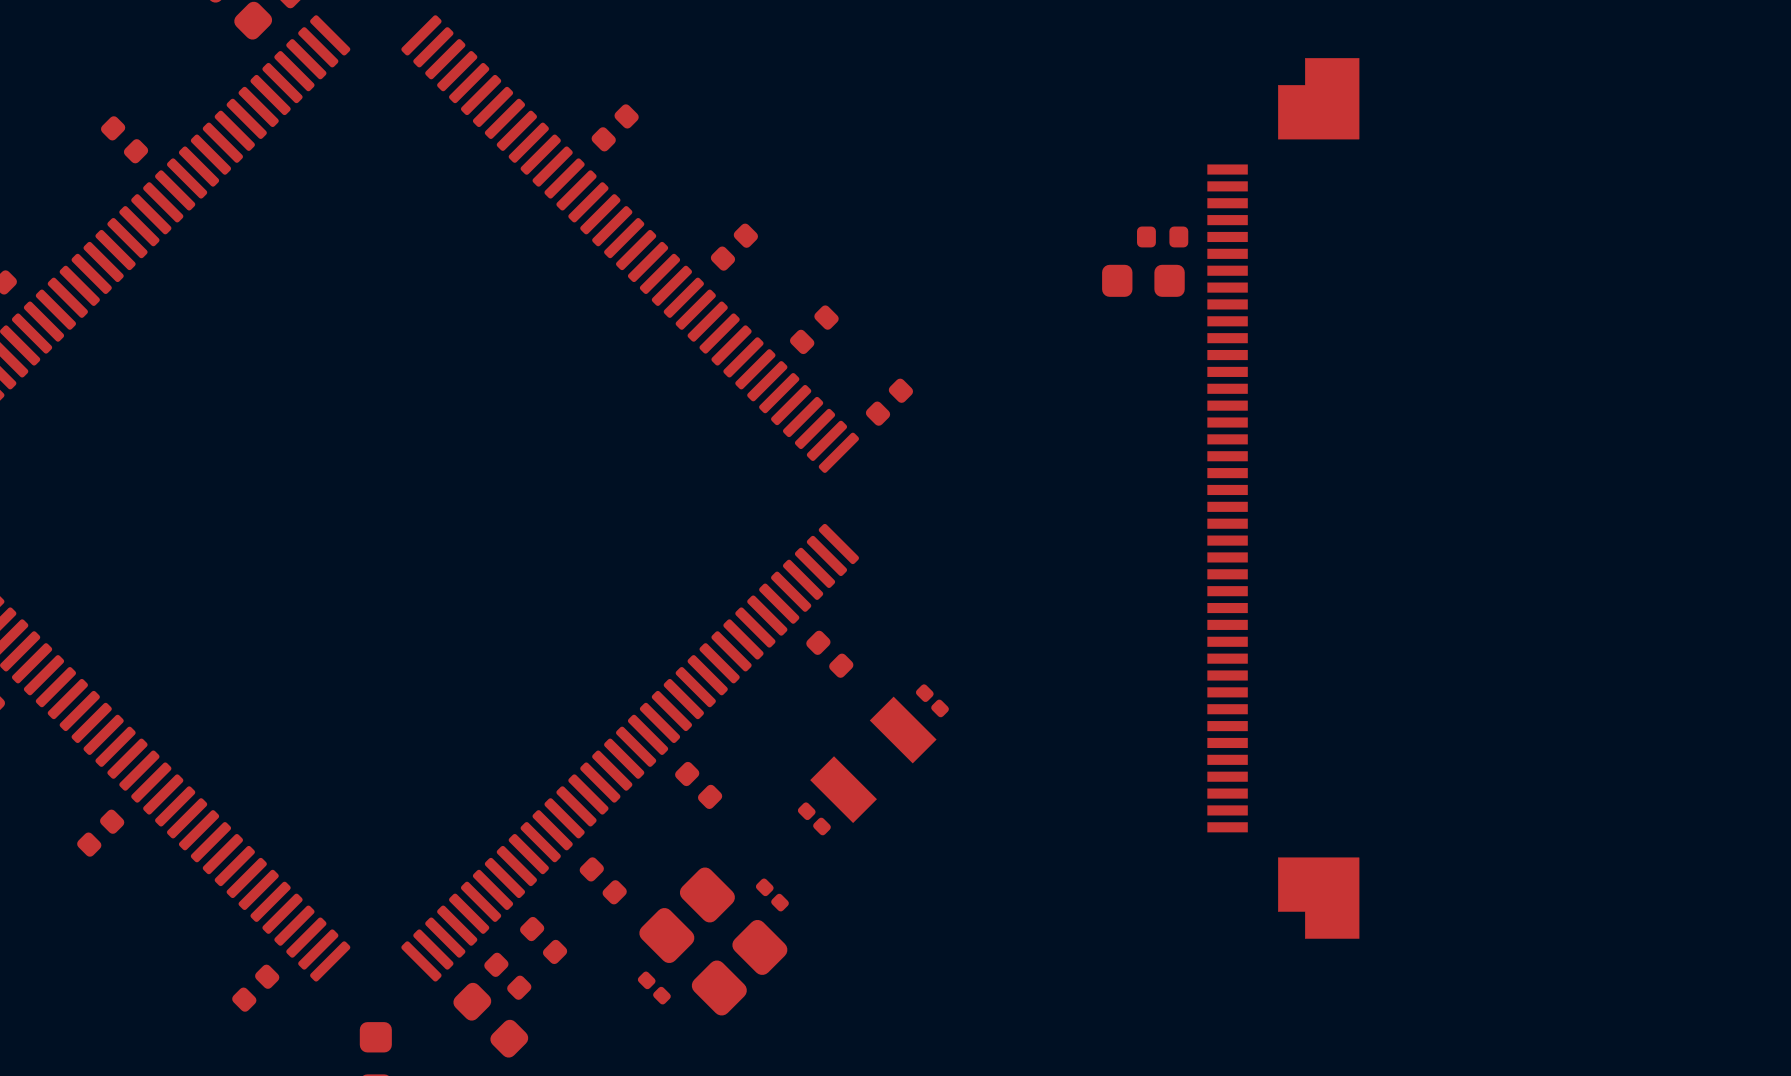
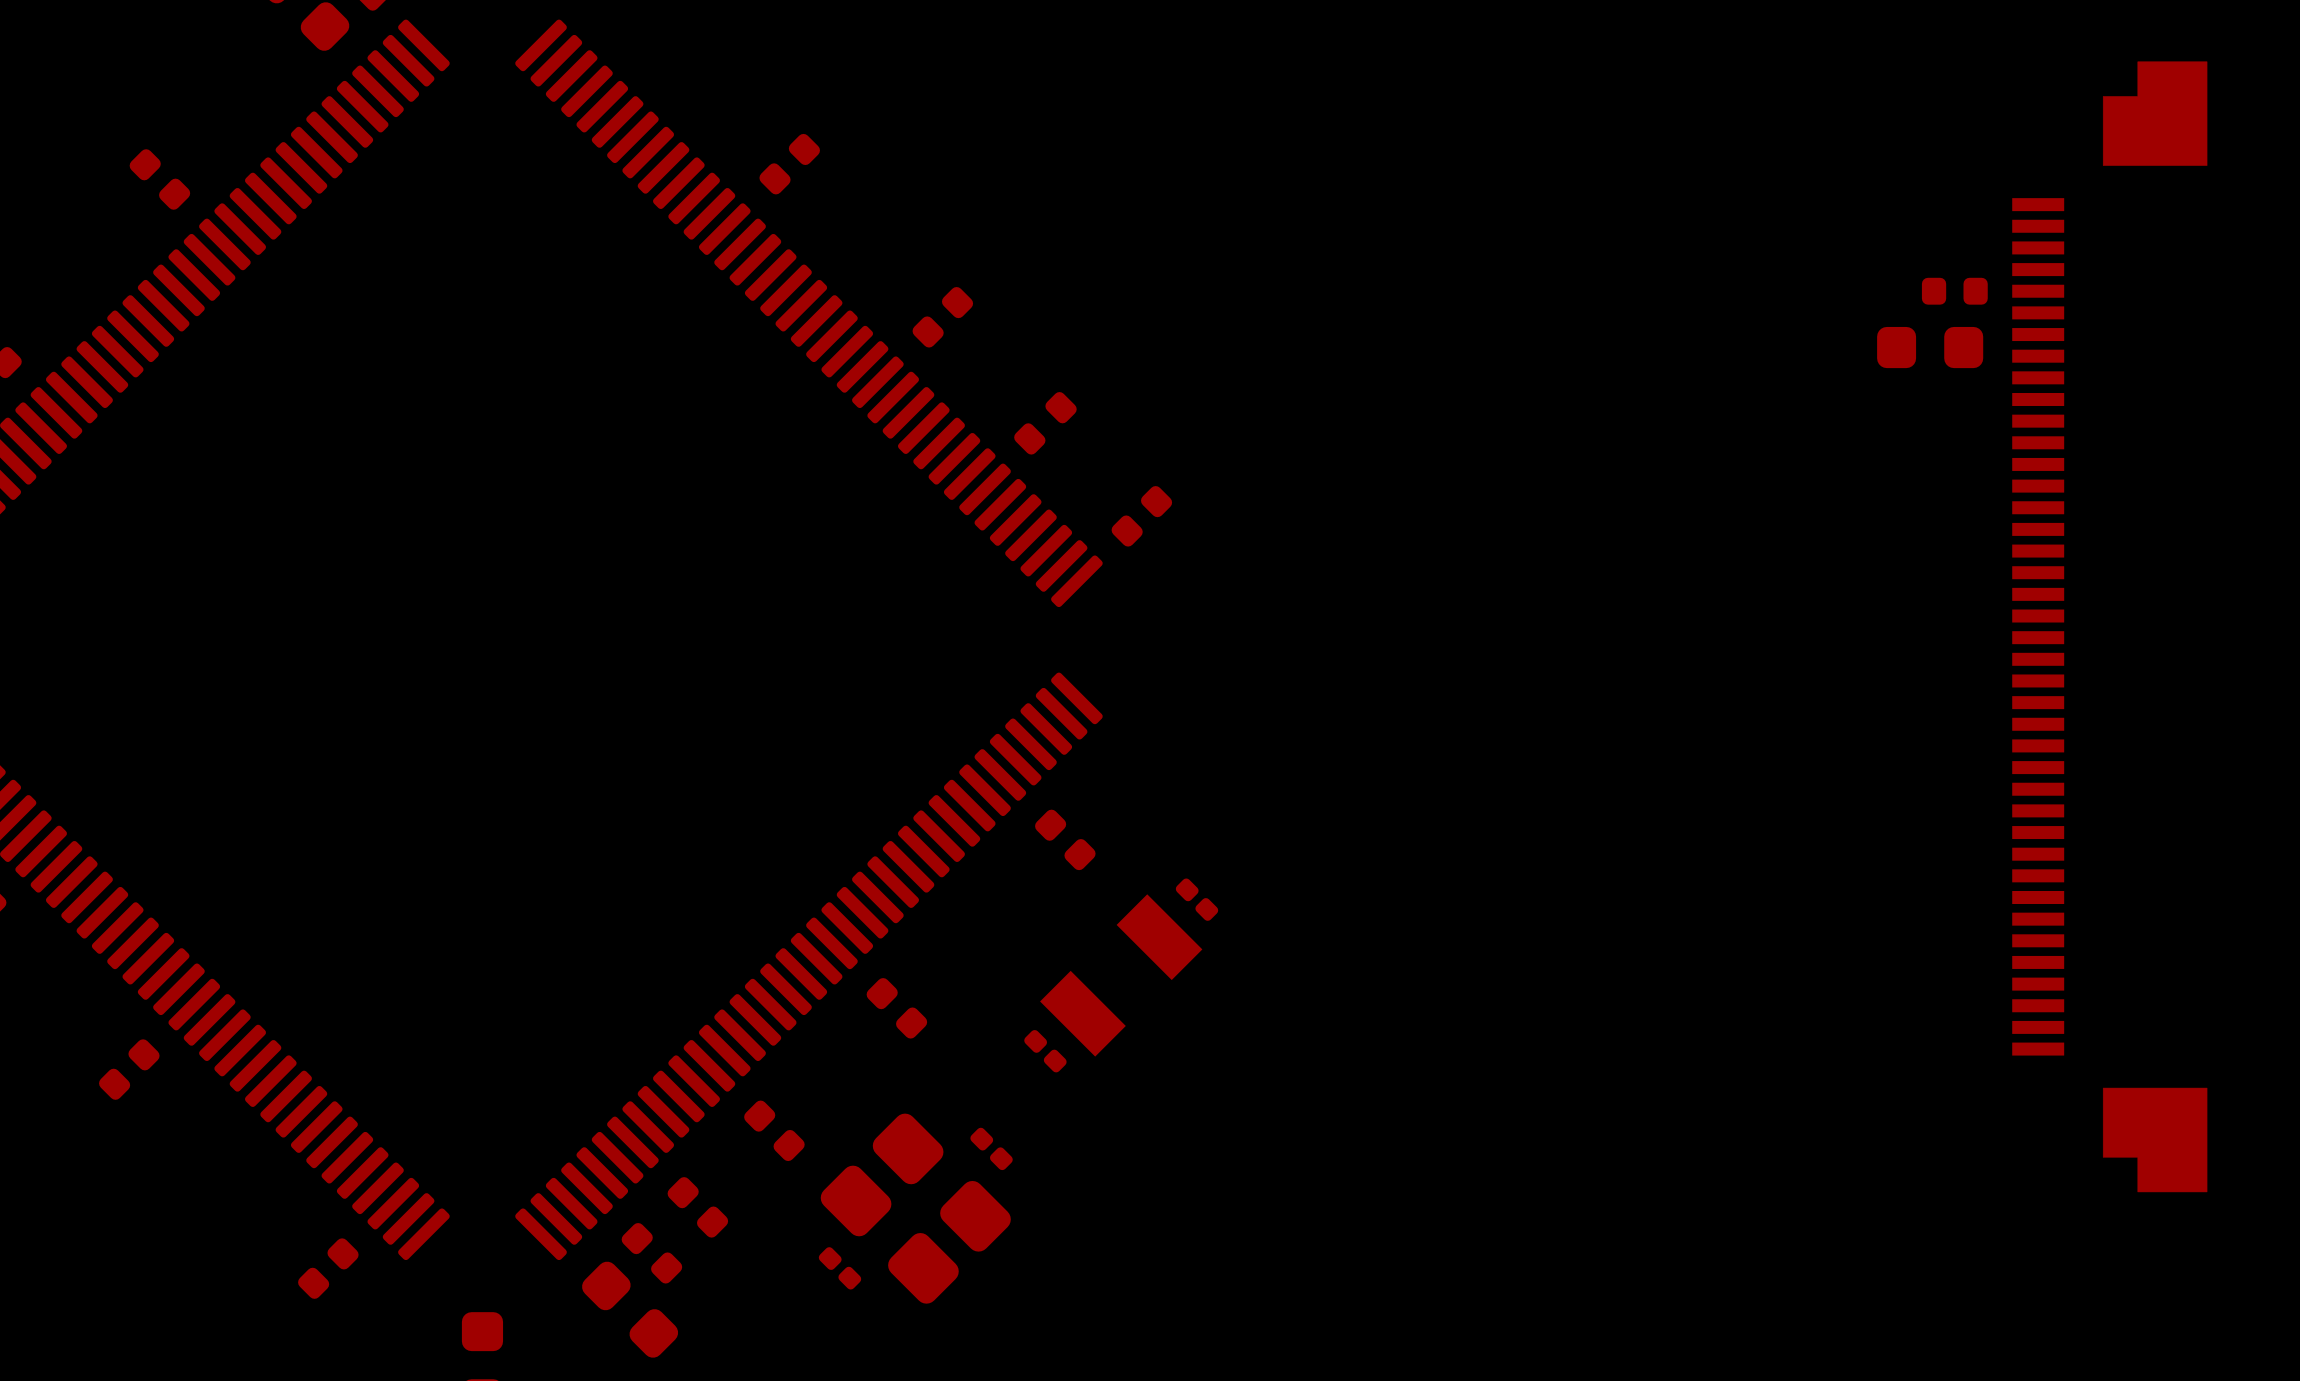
part position: (1162, 236) -> (1954, 291)
part position: (1143, 280) -> (1930, 347)
part position: (1283, 498) -> (2109, 626)

